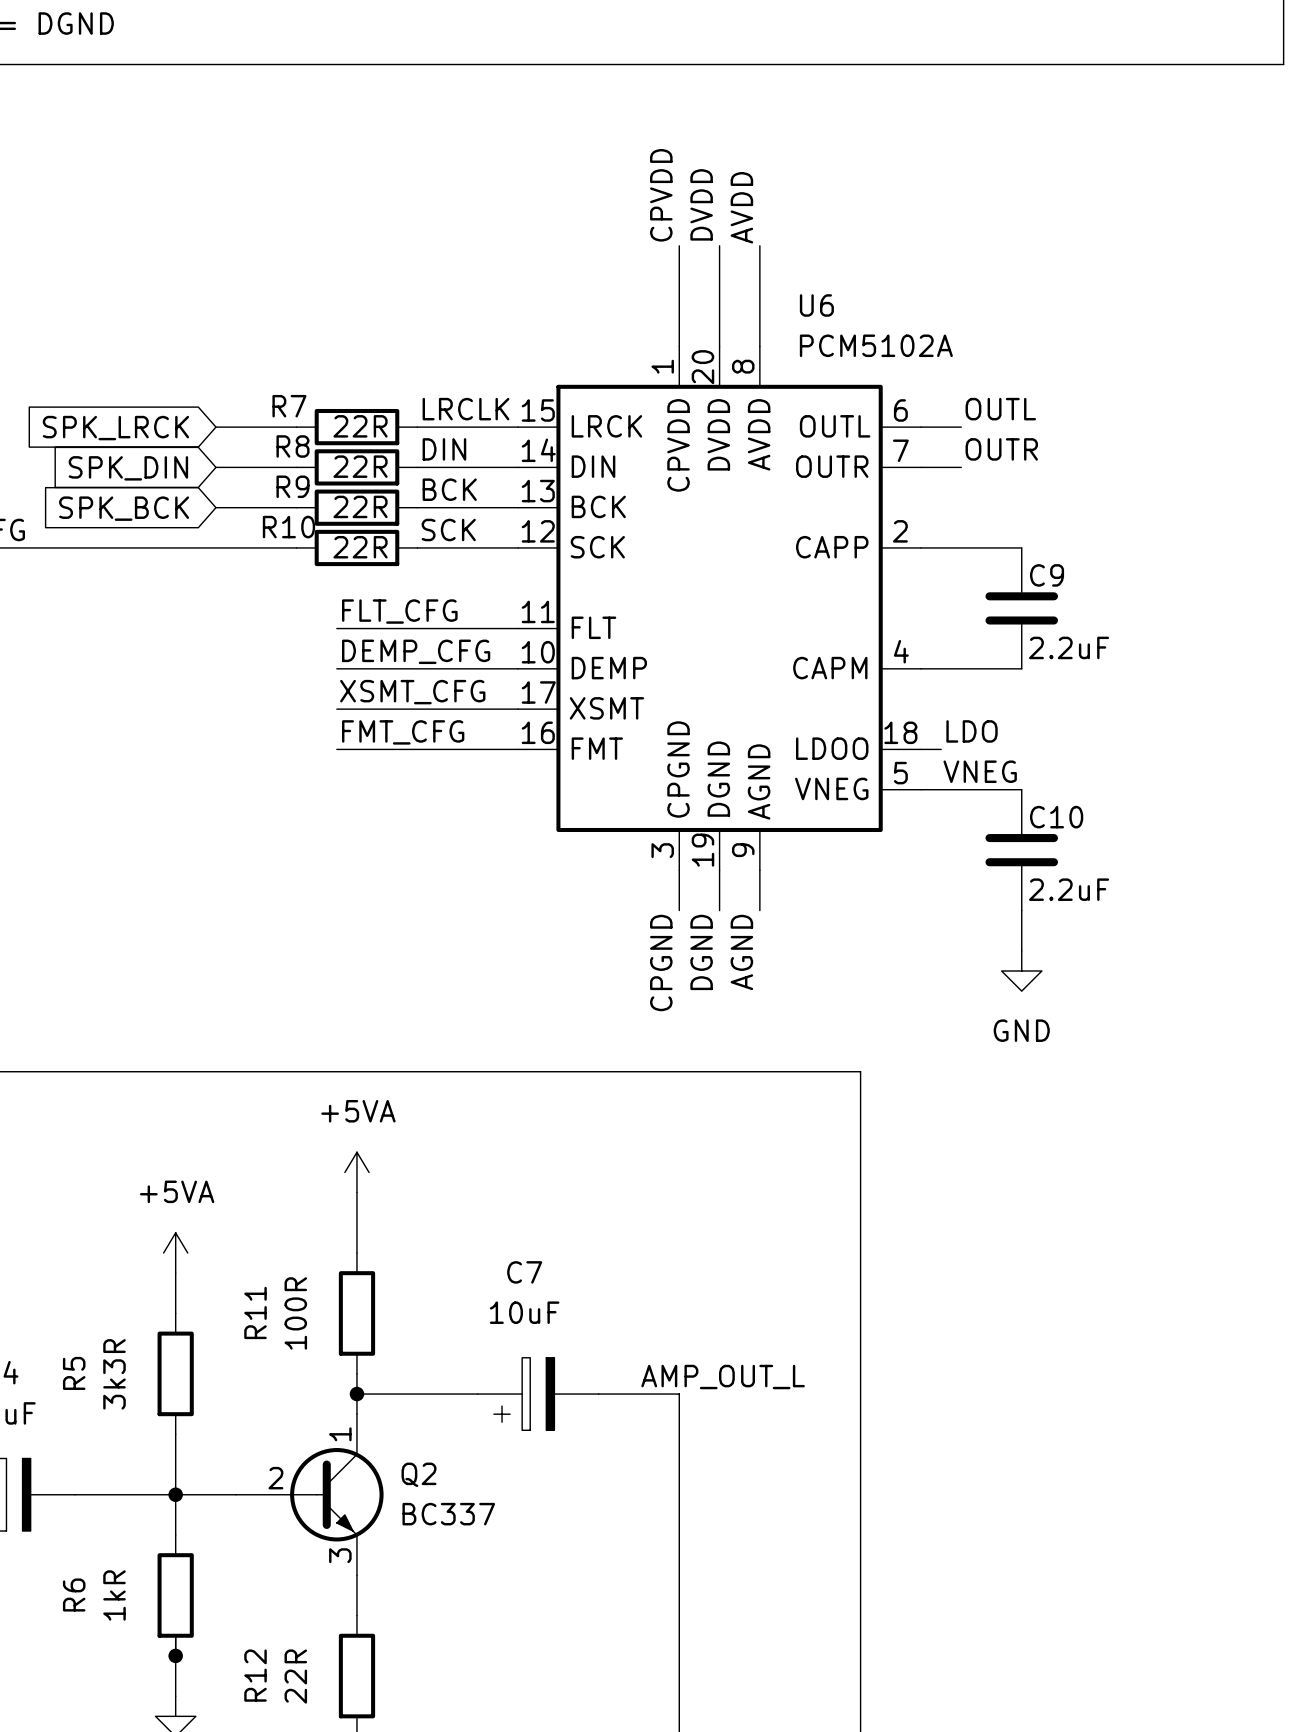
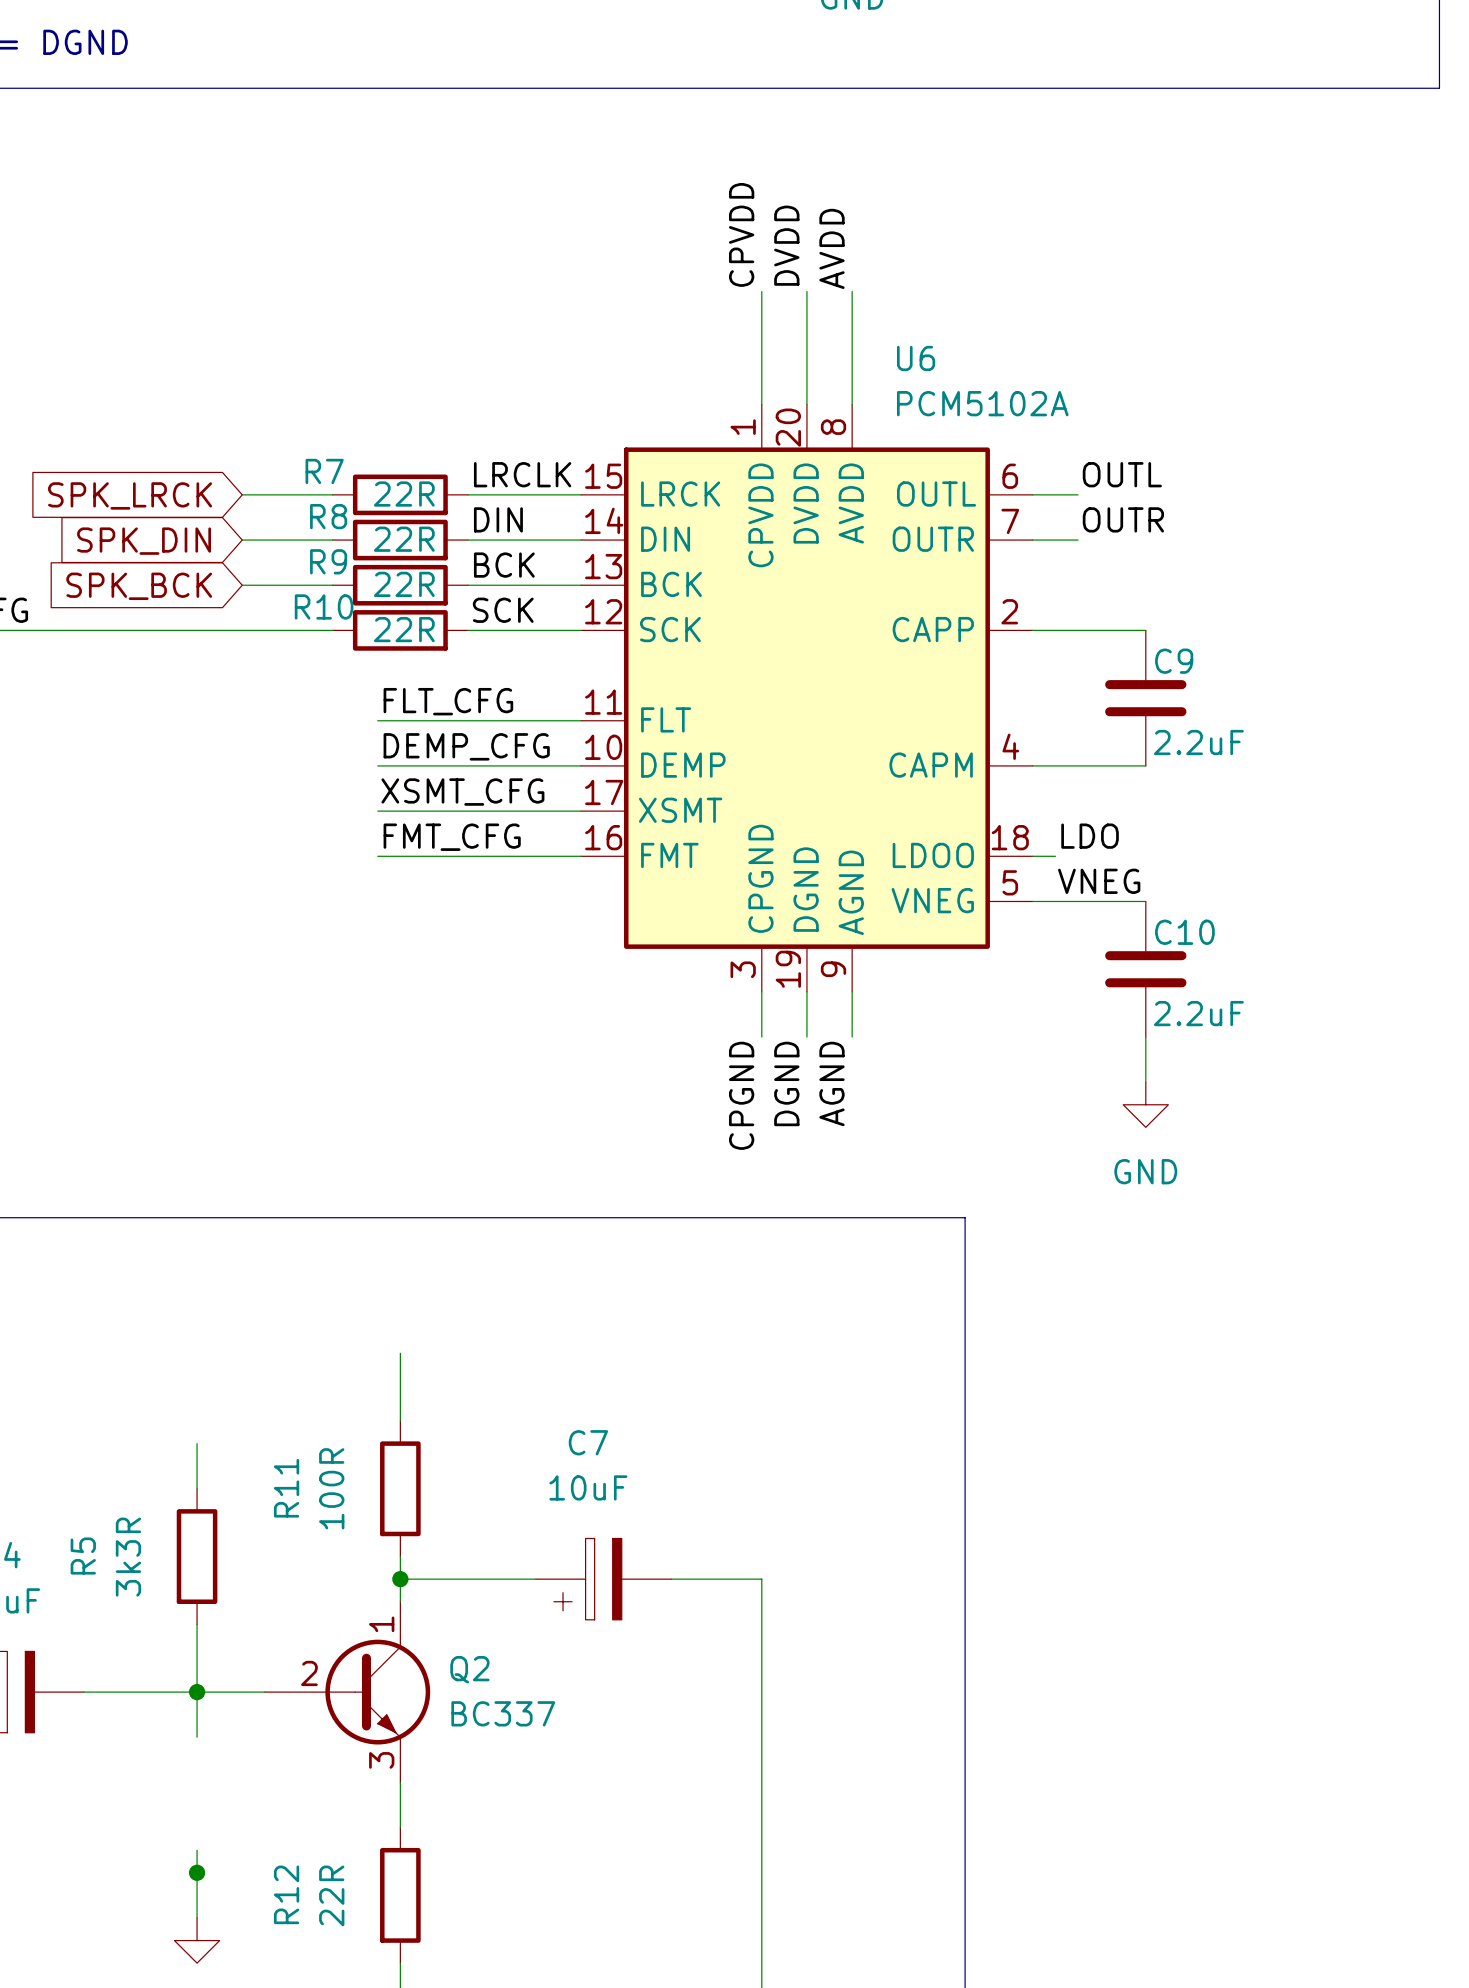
power symbol: +5VA (356, 1172) -> none
power symbol: +5VA (175, 1253) -> none
label: AMP_OUT_L (723, 1377) -> none
R6: 1kR (175, 1595) -> none

